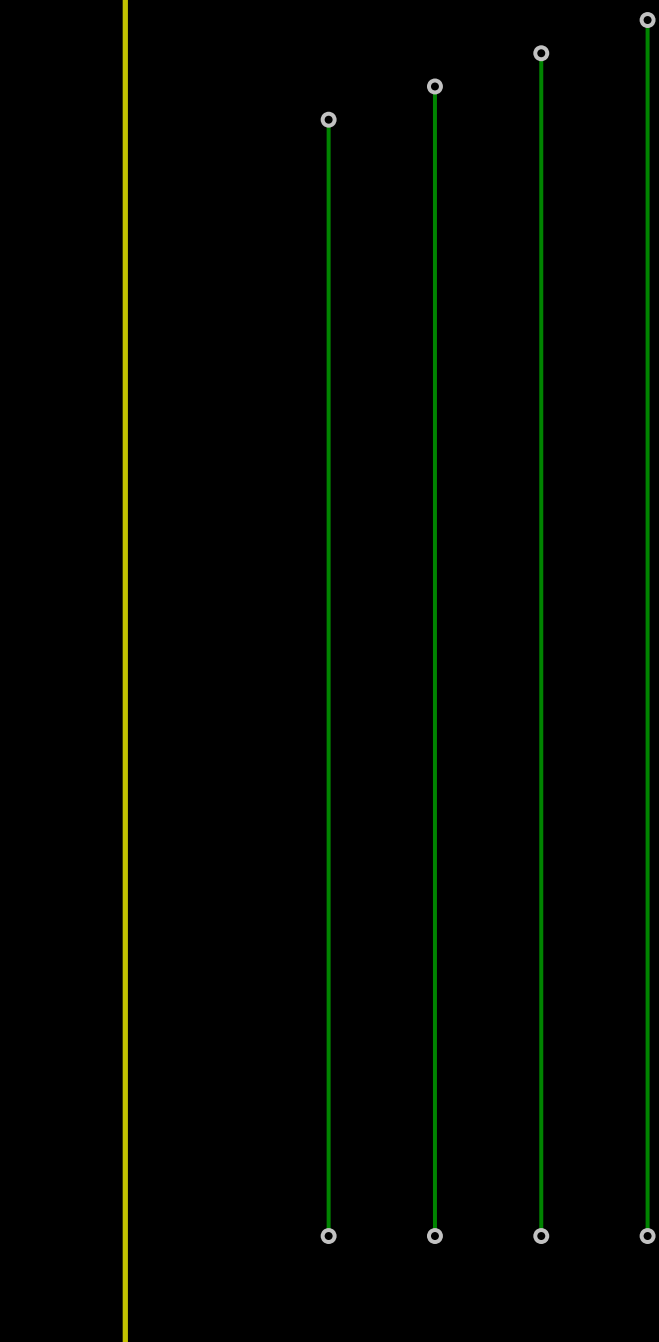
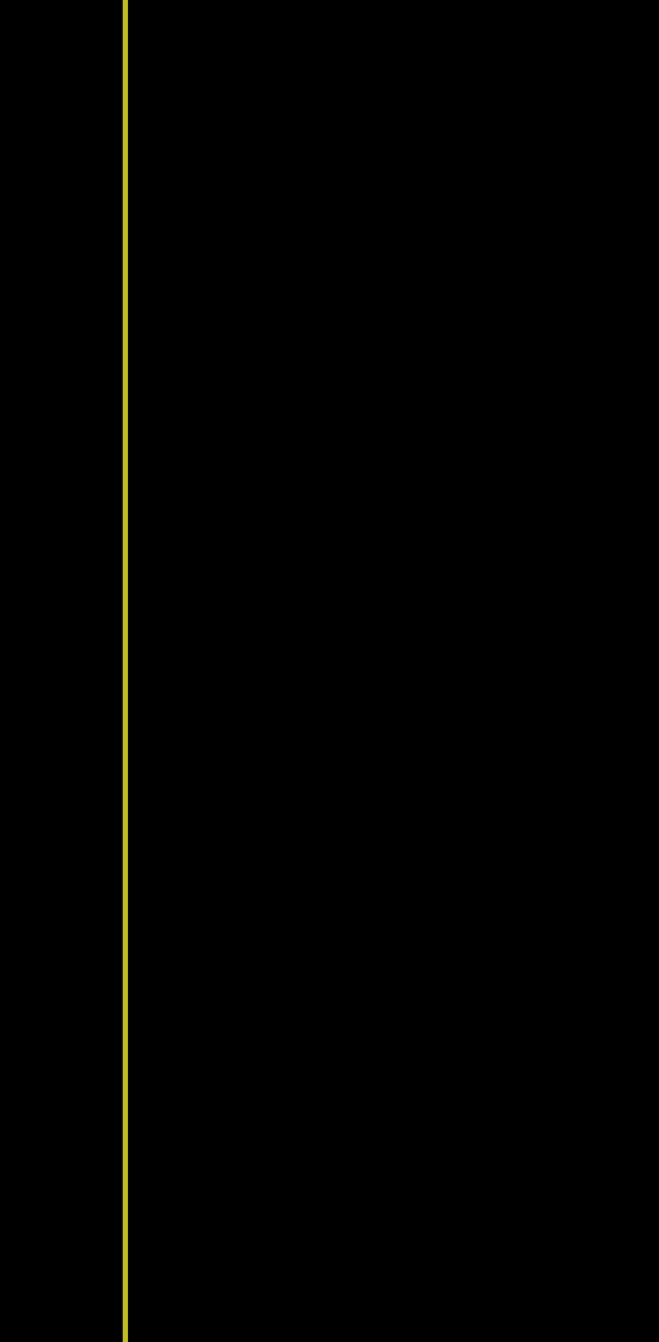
track: (647, 20) (647, 1236) -> none
via: (647, 20) -> none
track: (541, 53) (541, 1236) -> none
via: (541, 53) -> none
track: (434, 86) (434, 1236) -> none
via: (434, 86) -> none
track: (328, 119) (328, 1236) -> none
via: (328, 119) -> none
via: (328, 1236) -> none
via: (434, 1236) -> none
via: (541, 1236) -> none
via: (647, 1236) -> none

